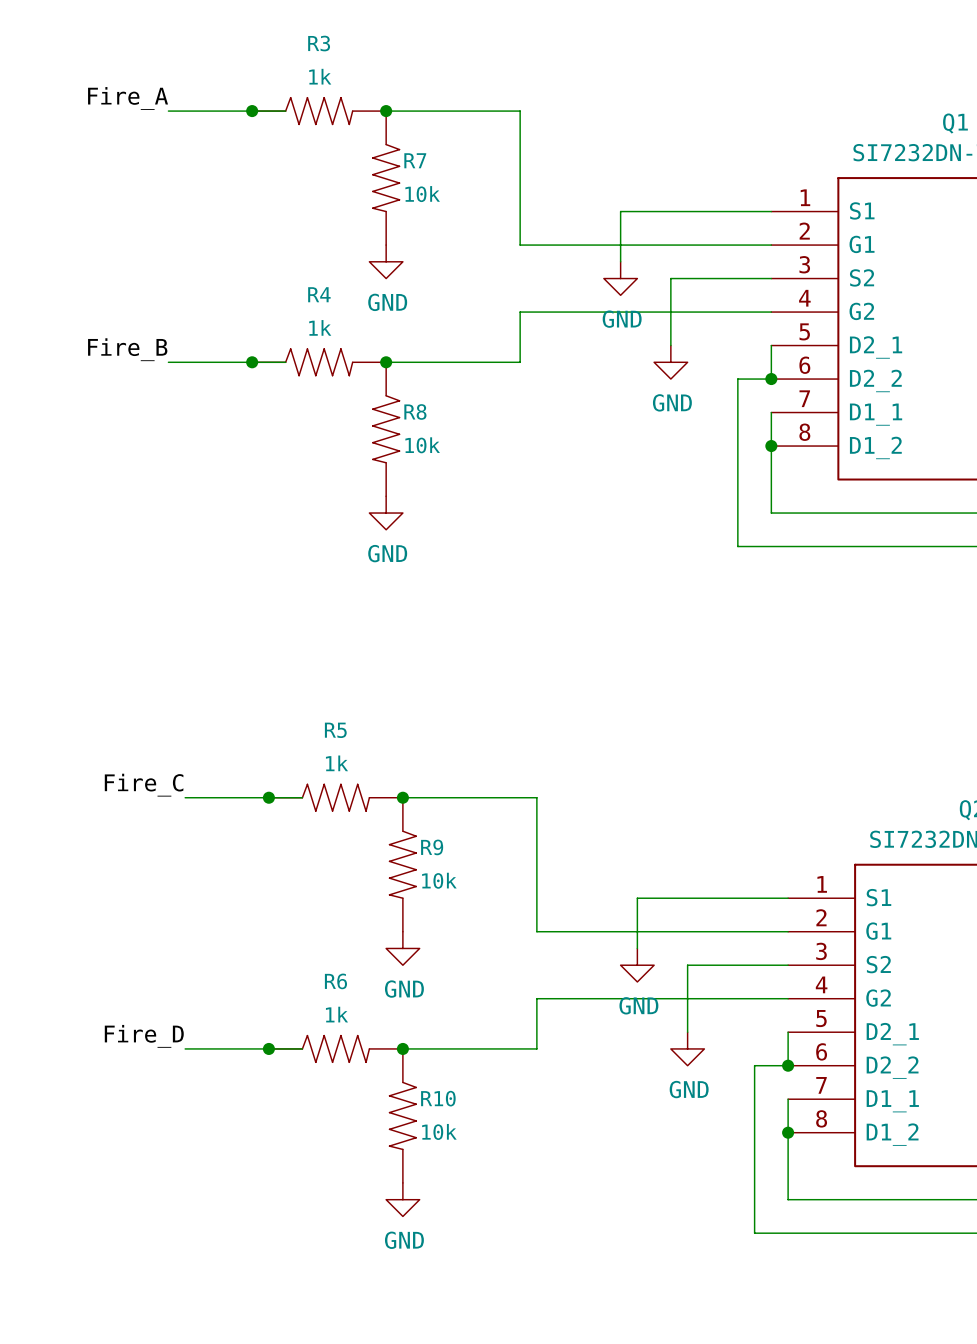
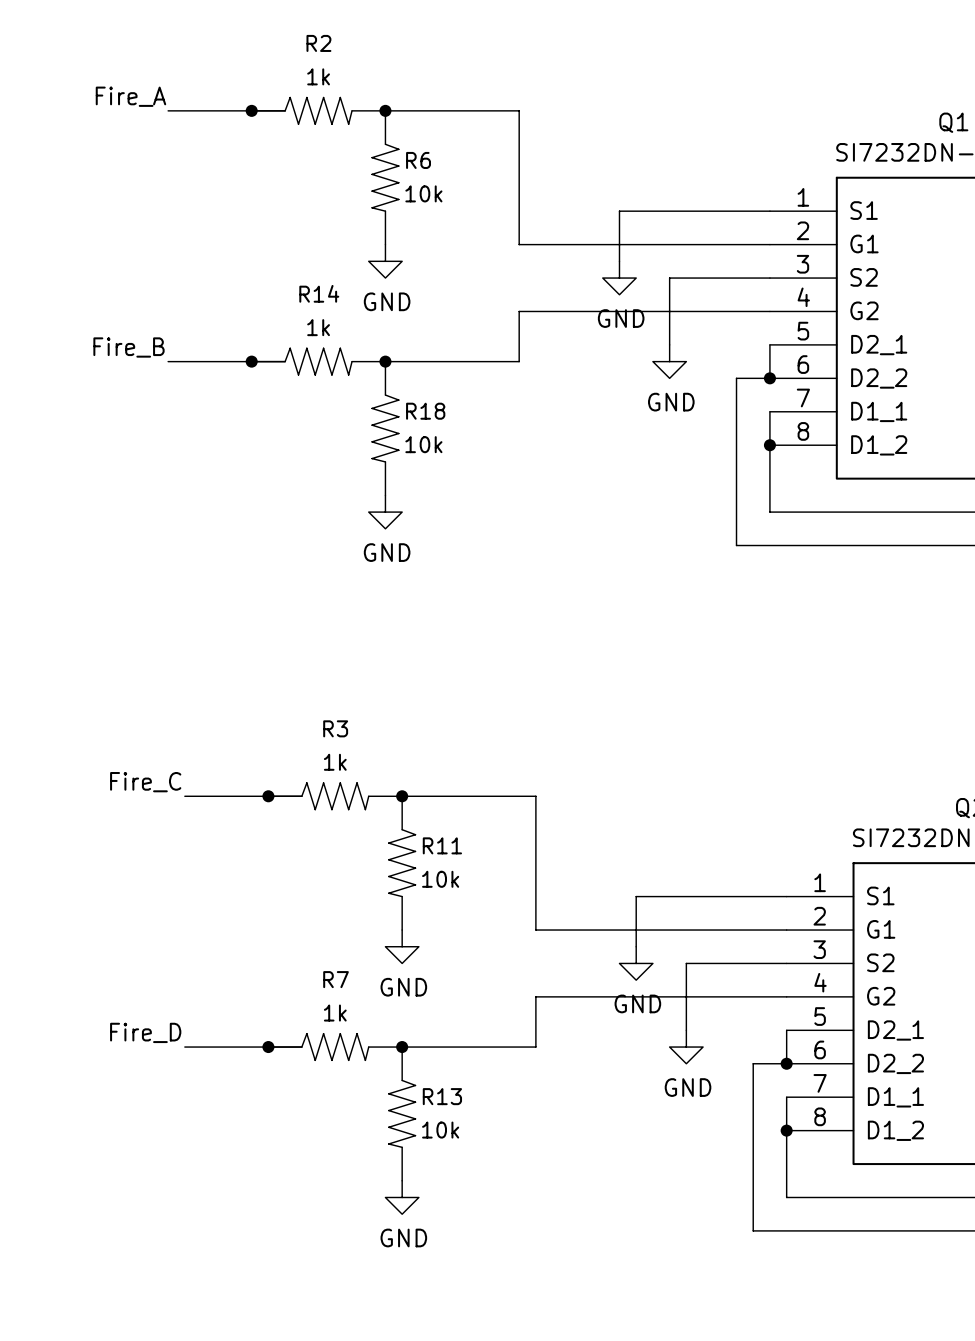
R3 name: R3 (319, 43) -> R2 (318, 43)
R7 name: R7 (415, 160) -> R6 (418, 160)
R4 name: R4 (319, 294) -> R14 (319, 293)
R8 name: R8 (415, 411) -> R18 (425, 411)
R5 name: R5 (335, 730) -> R3 (335, 728)
R9 name: R9 (432, 847) -> R11 (442, 845)
R6 name: R6 (335, 981) -> R7 (336, 979)
R10 name: R10 (438, 1098) -> R13 (442, 1096)

